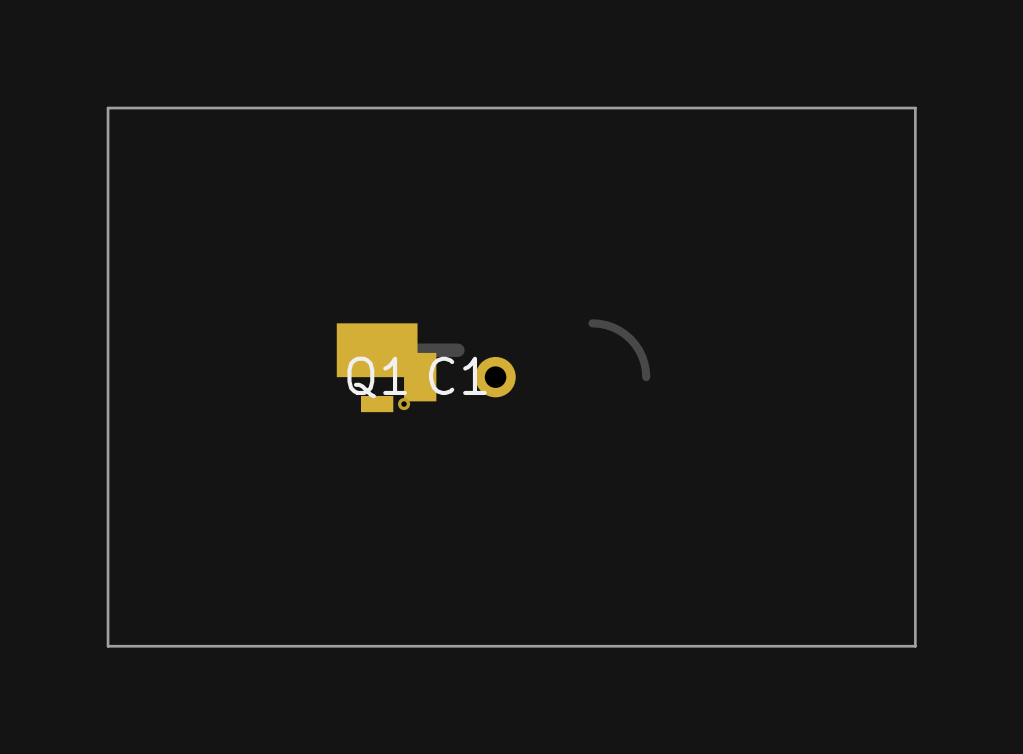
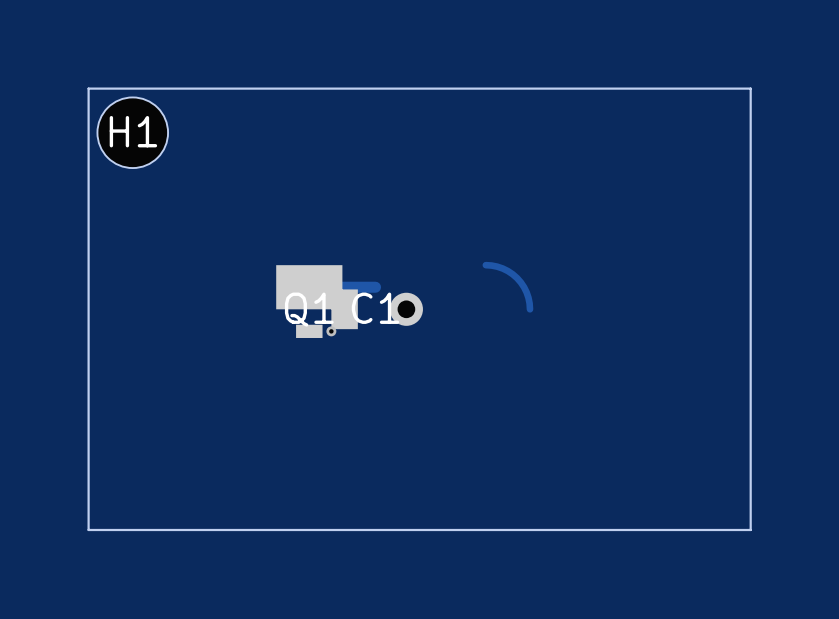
H1: none -> (132, 132)

